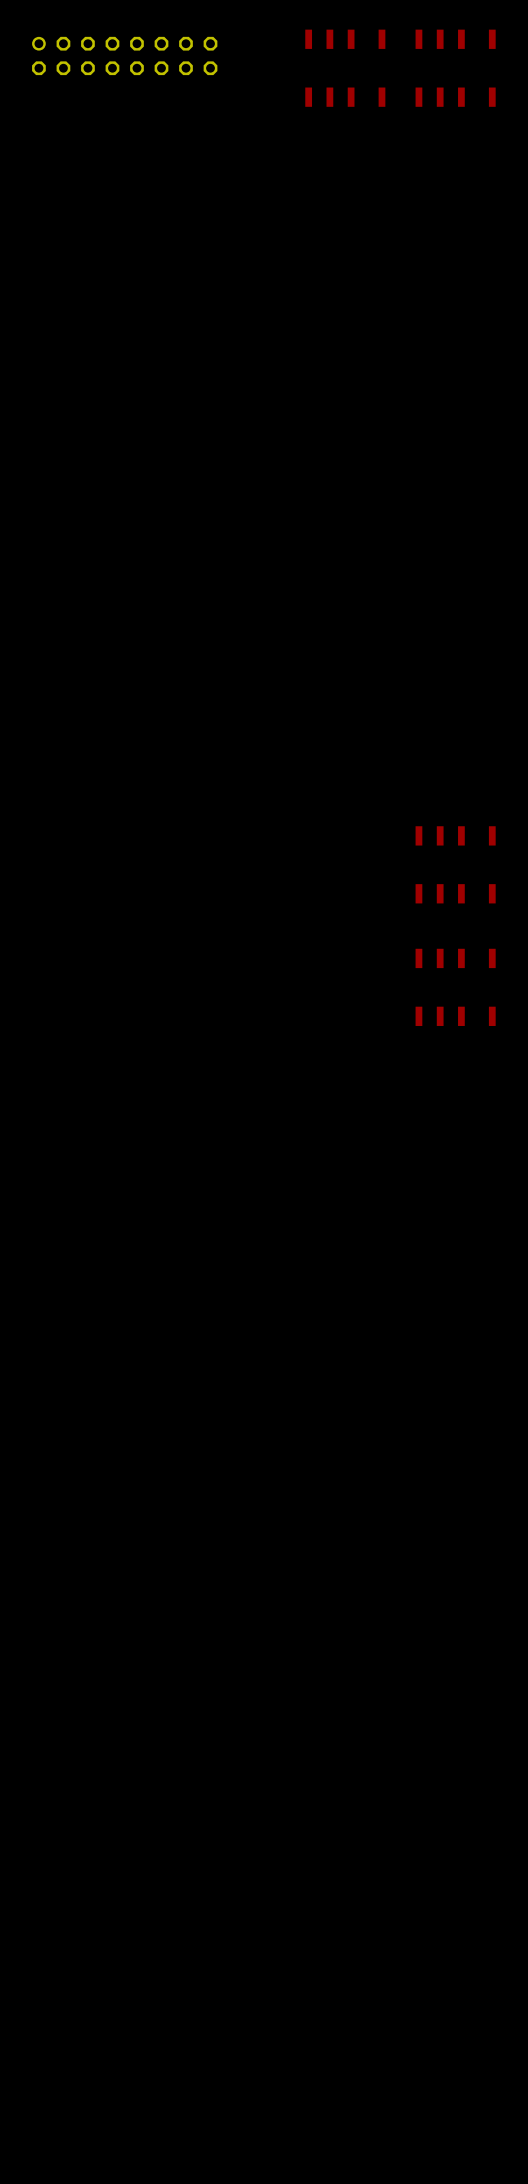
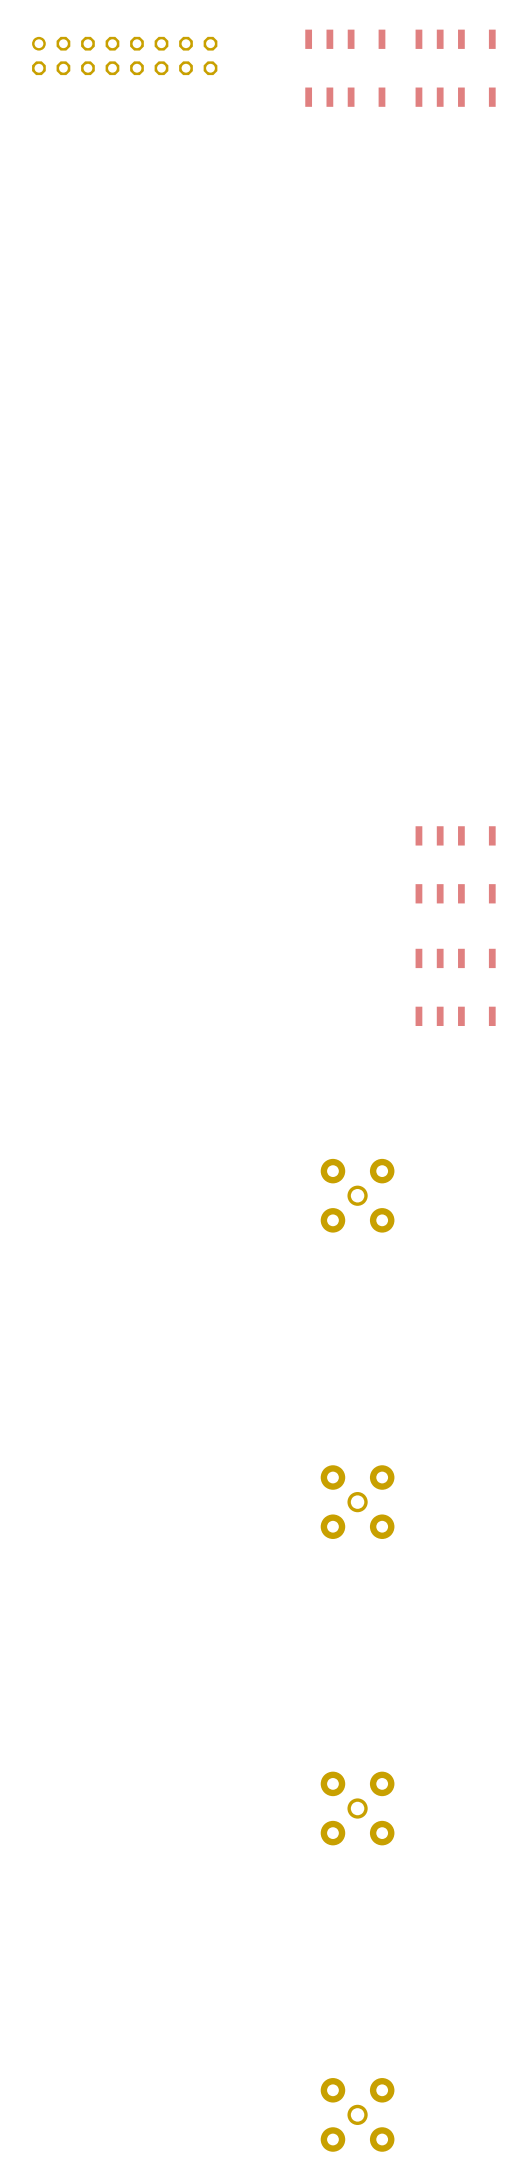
part: none -> (357, 1195)
part: none -> (357, 1502)
part: none -> (357, 1808)
part: none -> (357, 2114)

